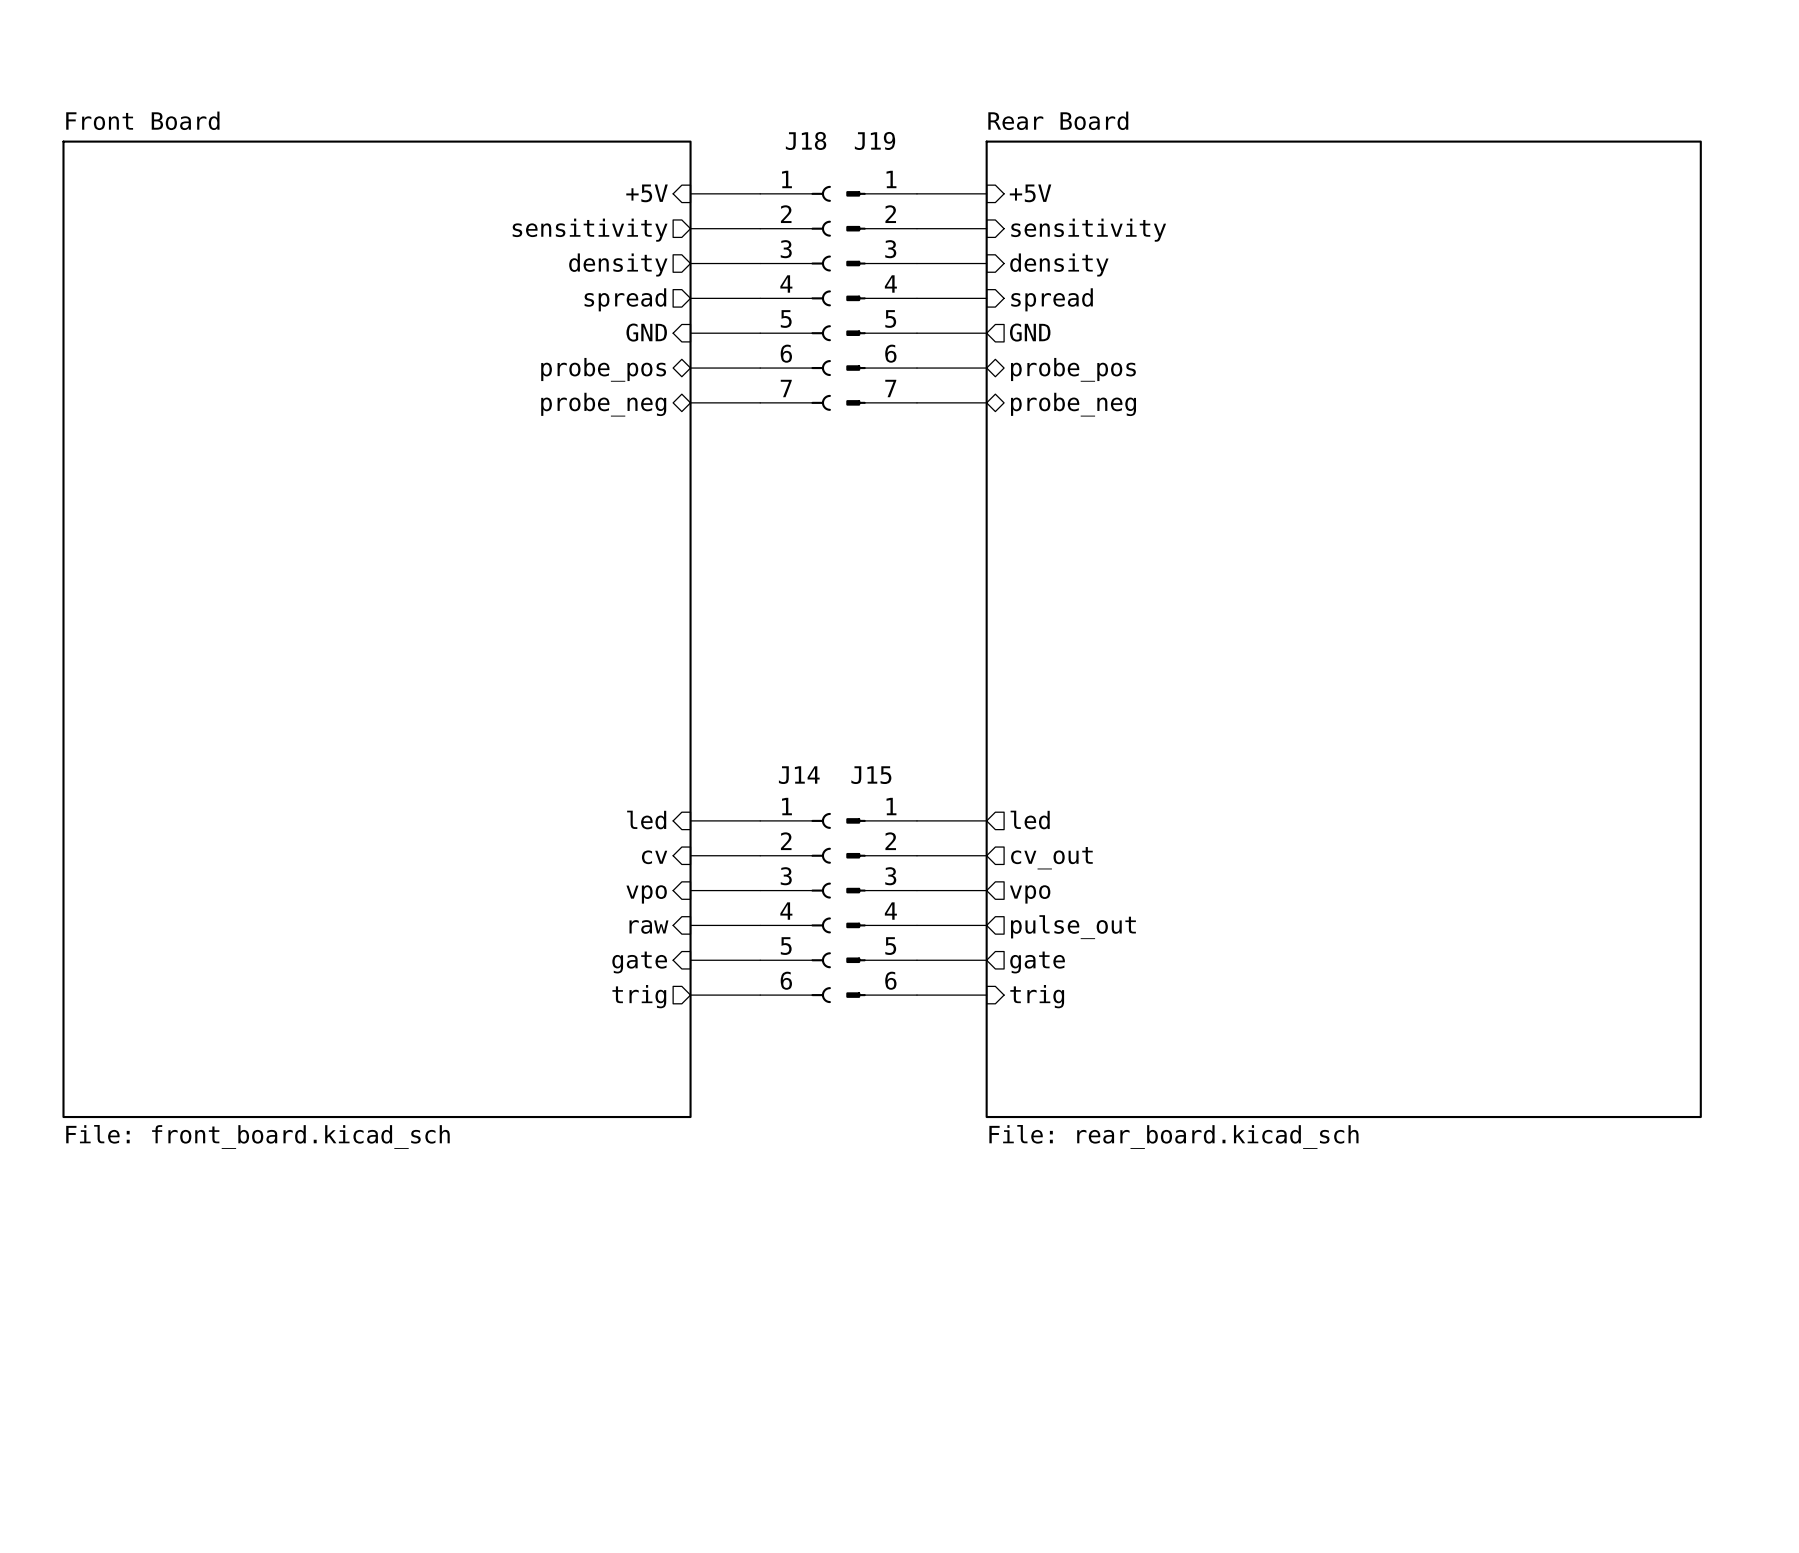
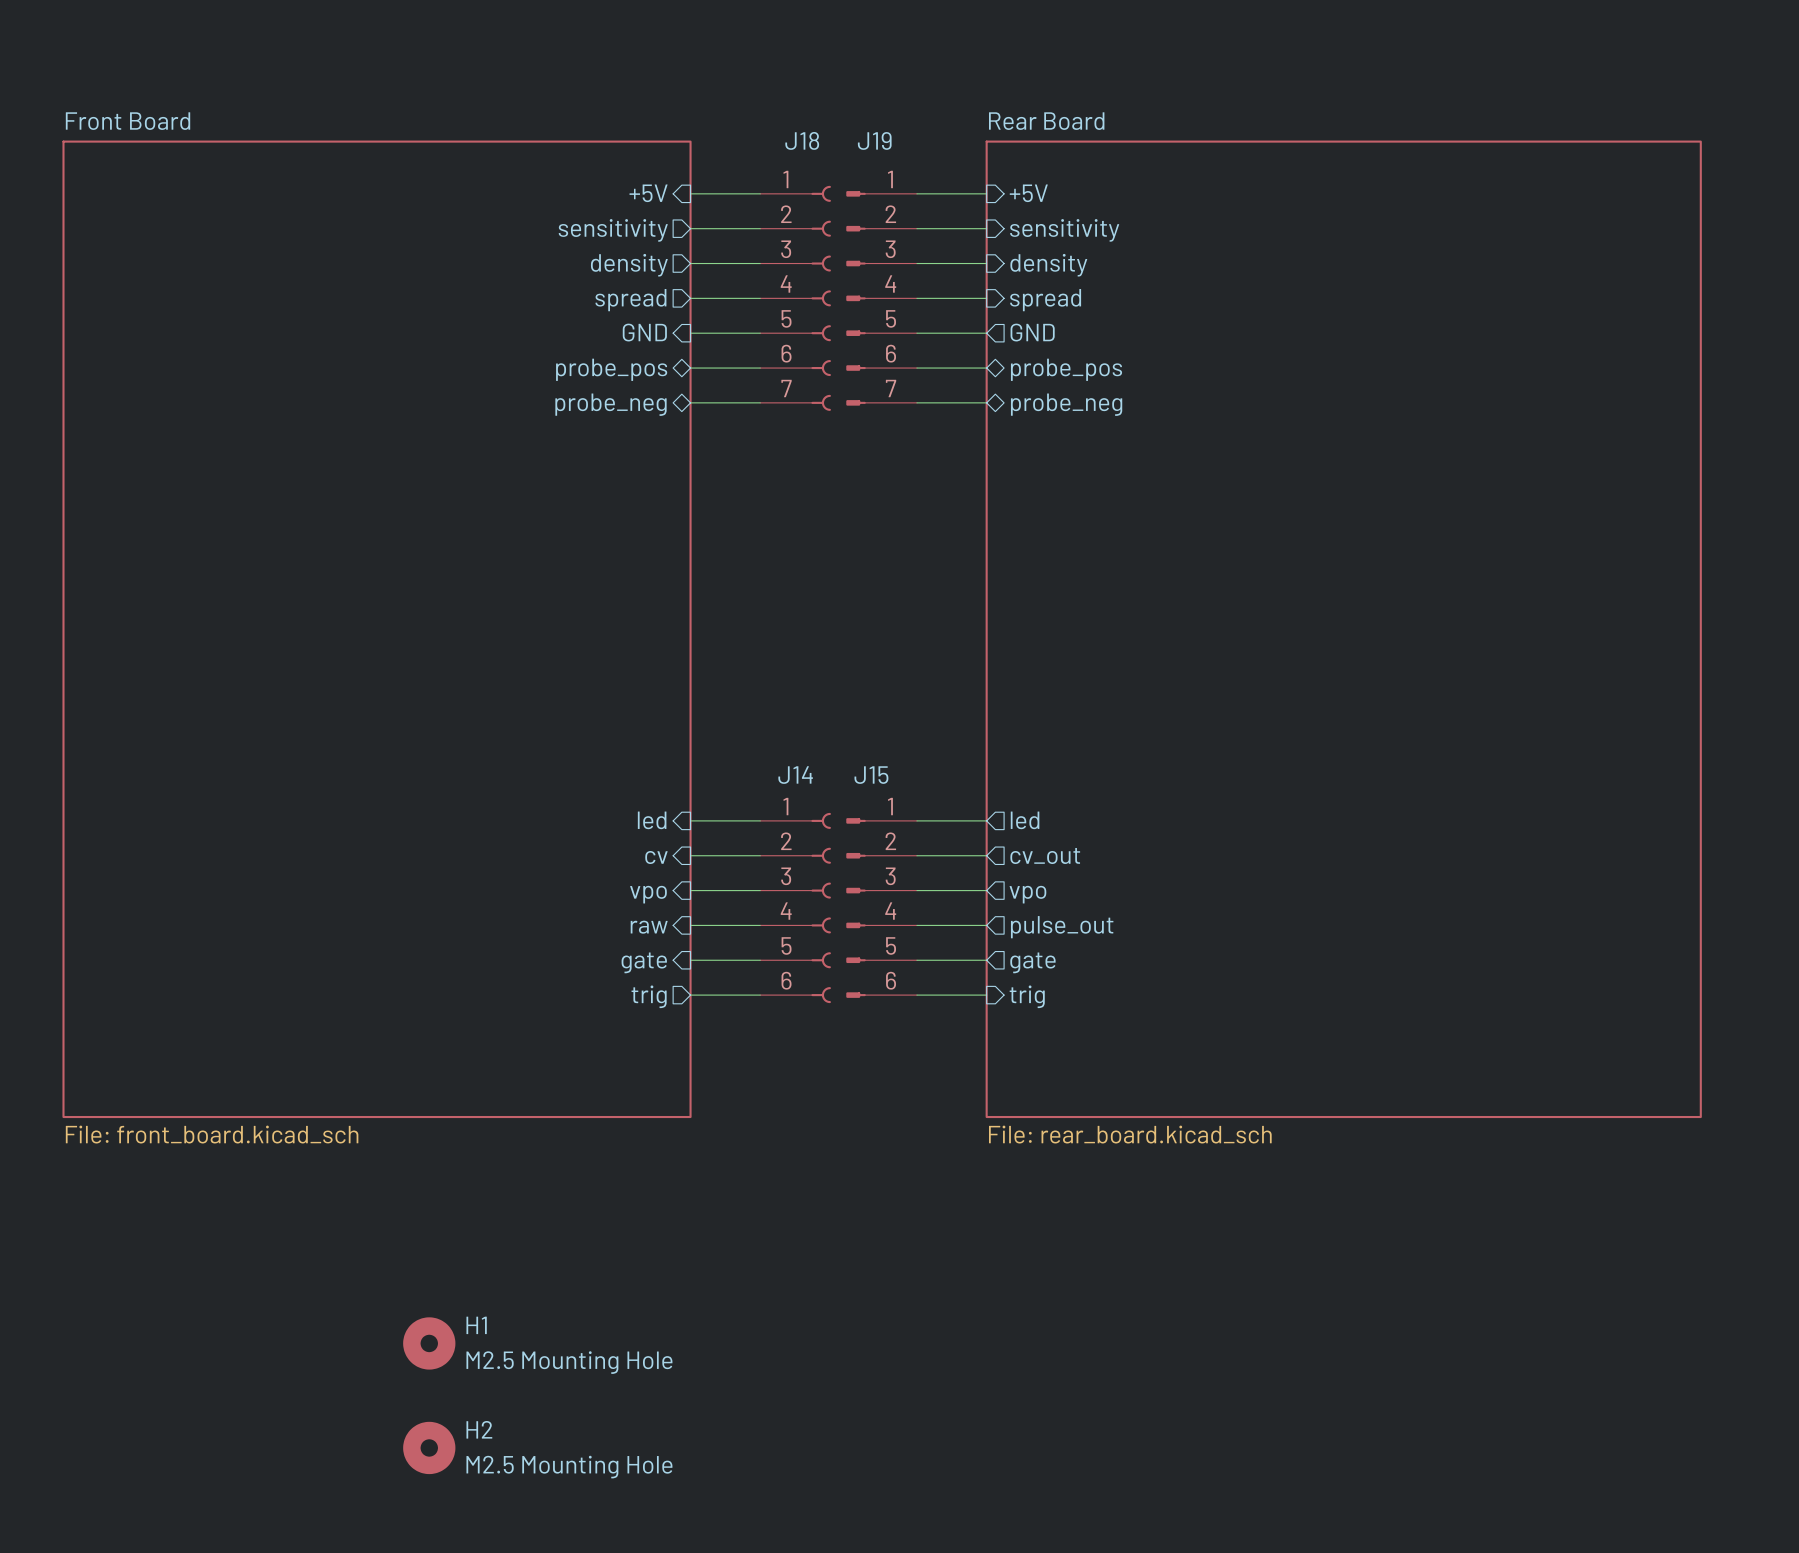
H1: none -> M2.5 Mounting Hole (429, 1343)
H2: none -> M2.5 Mounting Hole (429, 1447)

